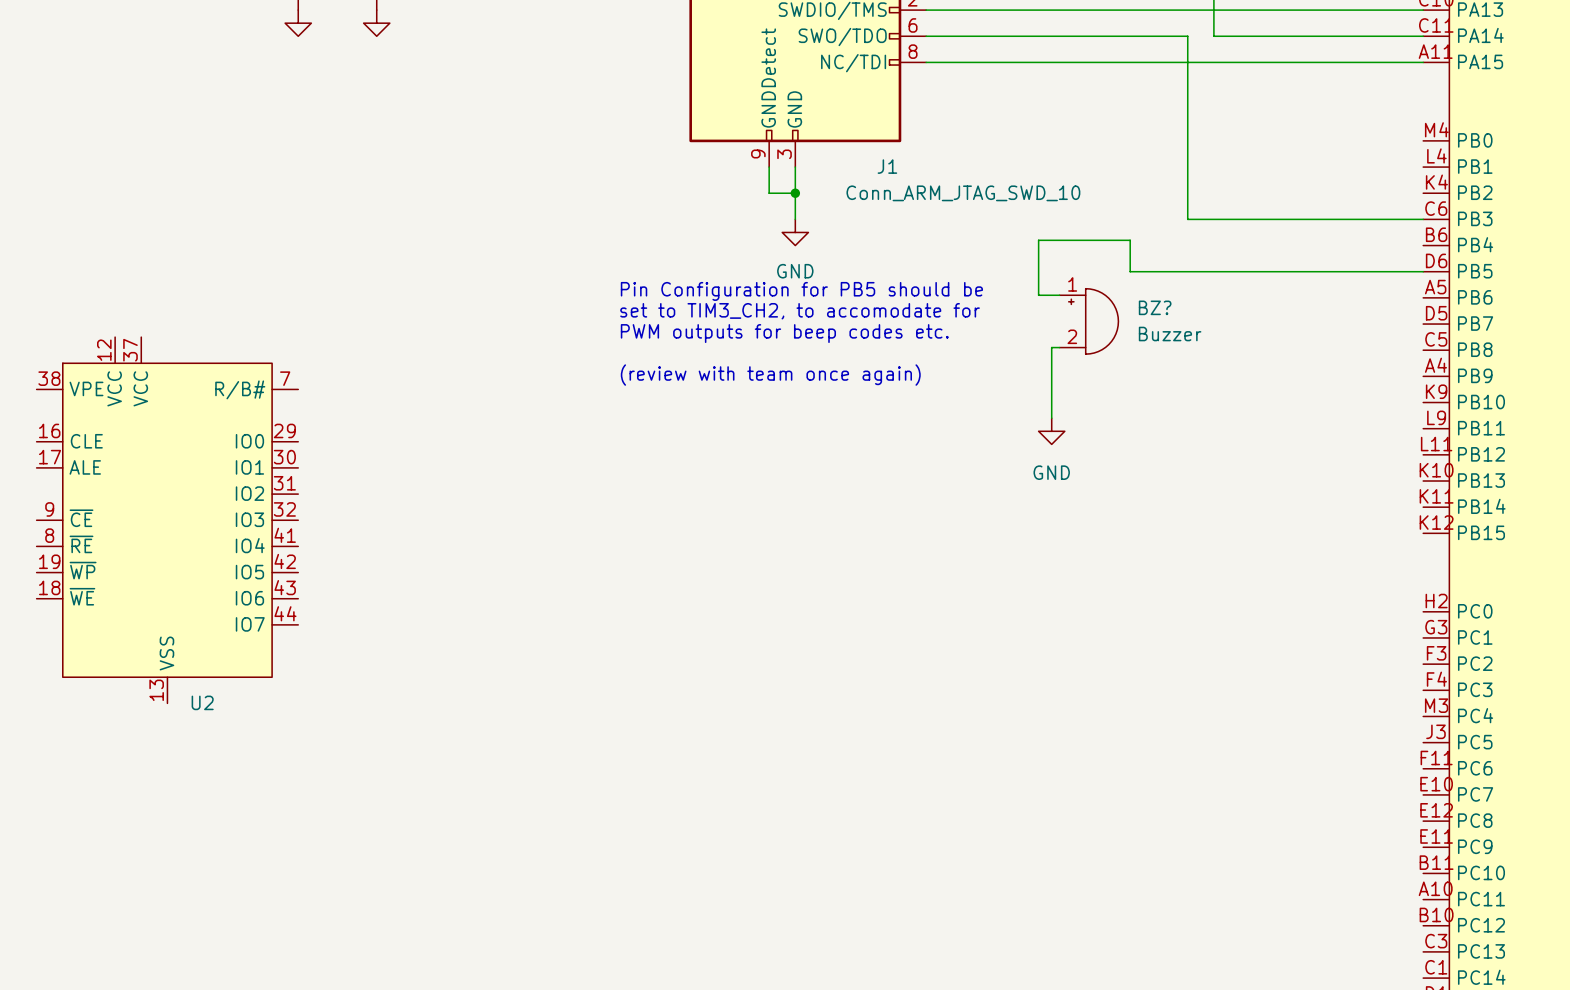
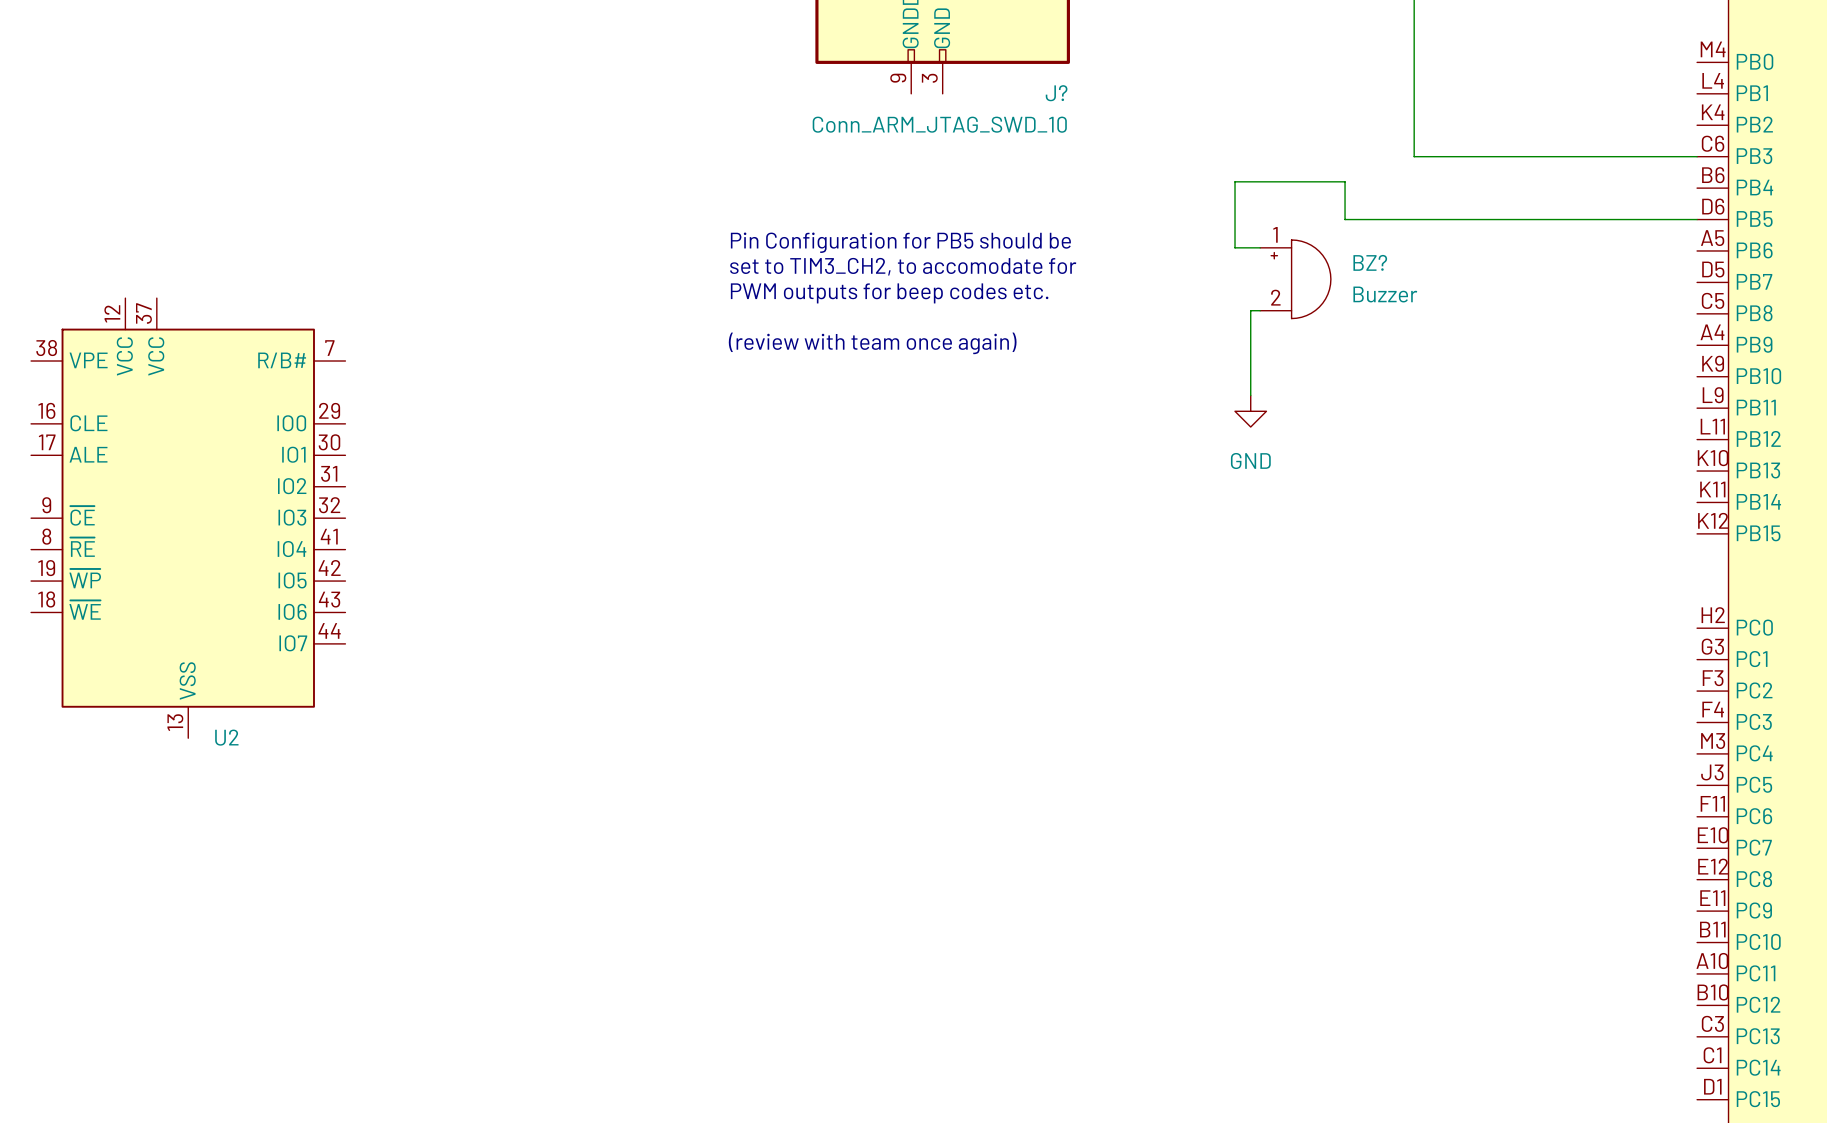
J1 name: J1 (887, 166) -> J? (1056, 93)
wire: (769, 167) (769, 193) (795, 193) -> none
wire: (795, 167) (795, 219) -> none
junction: (795, 193) -> none
J1 value position: Conn_ARM_JTAG_SWD_10 (963, 193) -> Conn_ARM_JTAG_SWD_10 (939, 124)
power symbol: GND (795, 232) -> none

